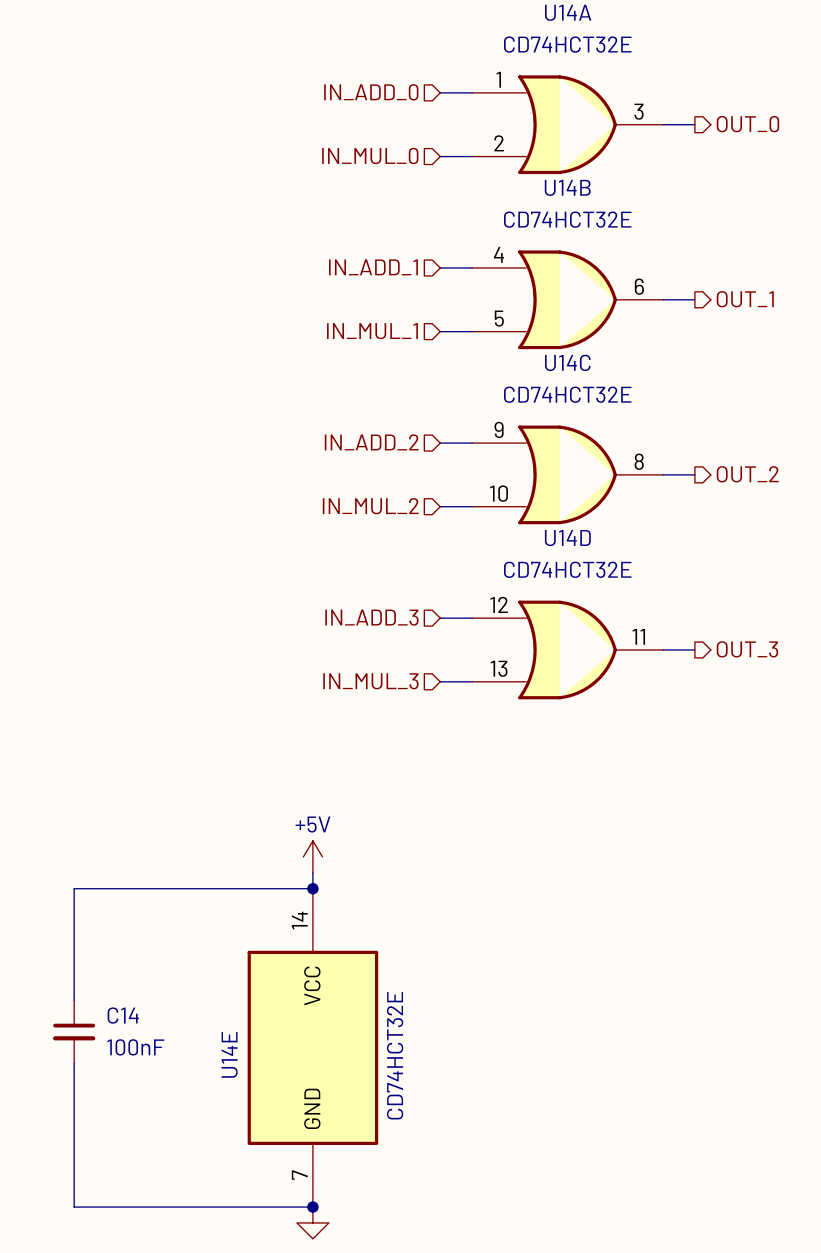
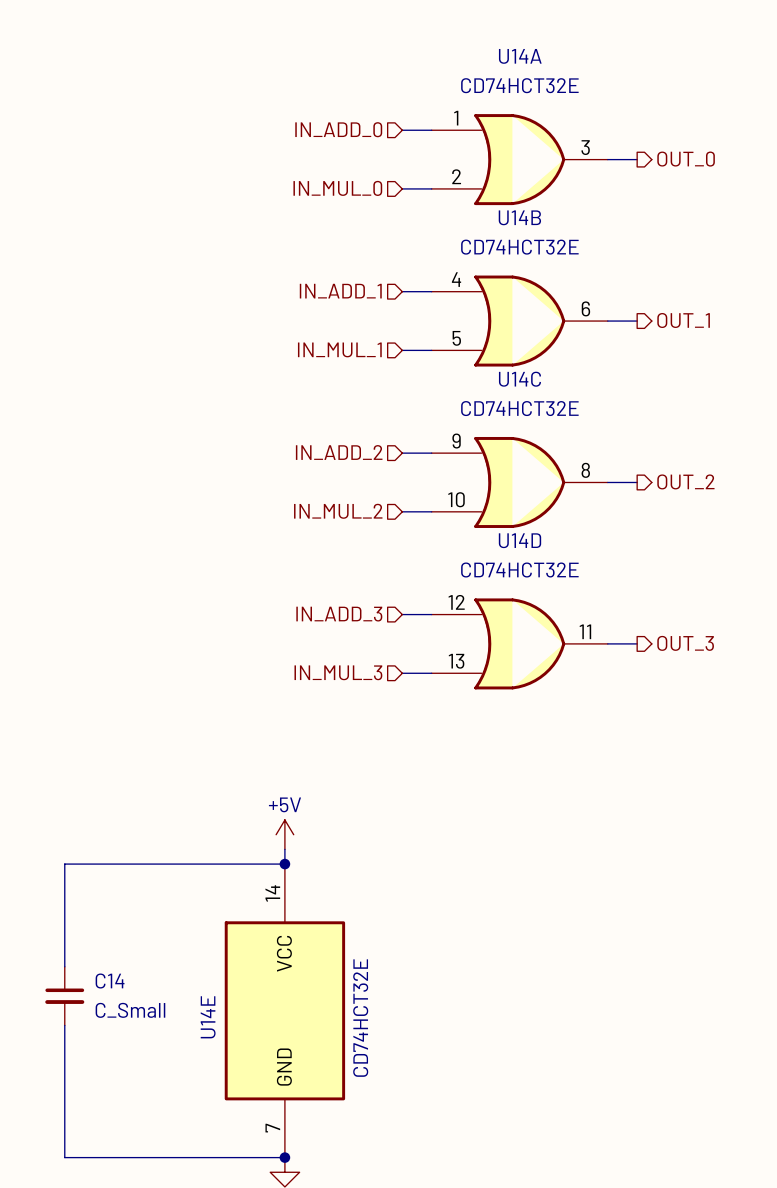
C14 value: 100nF (135, 1047) -> C_Small (130, 1010)

